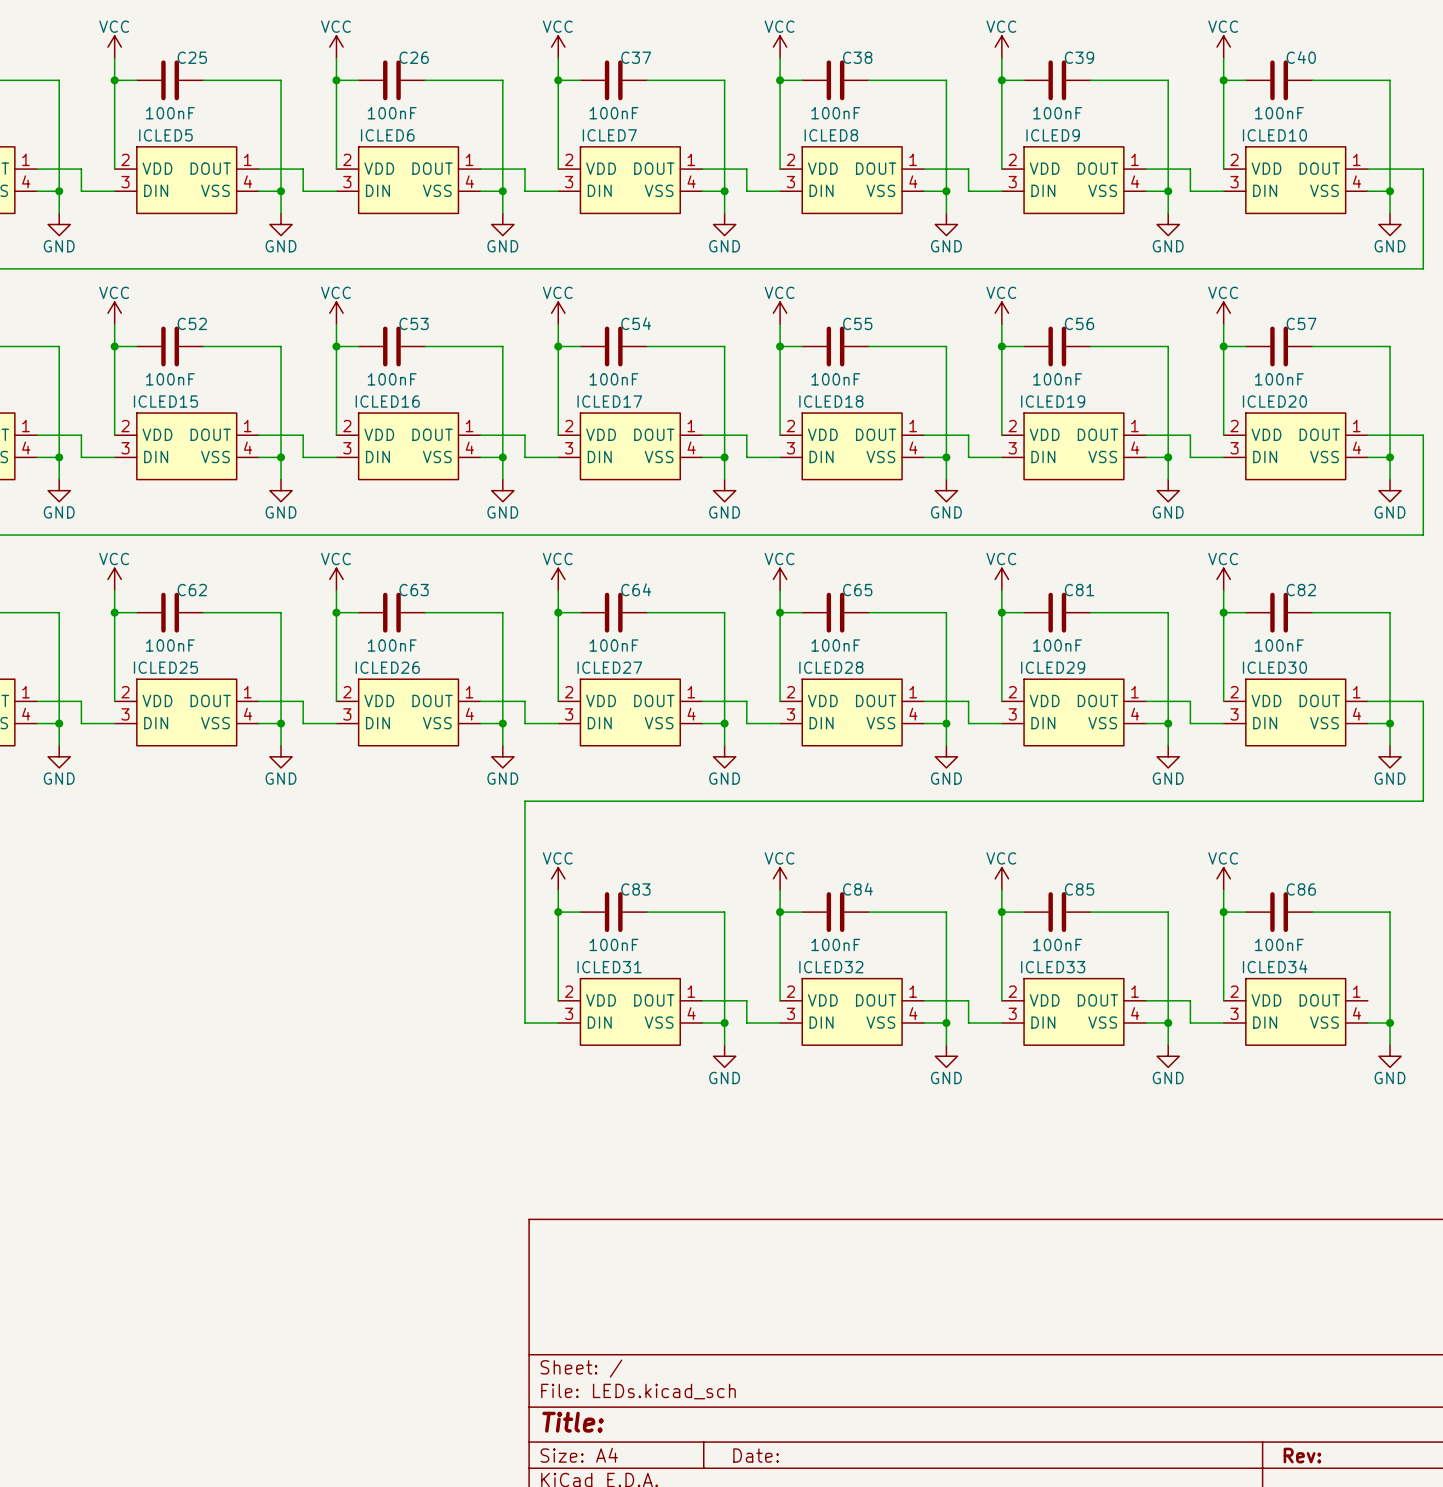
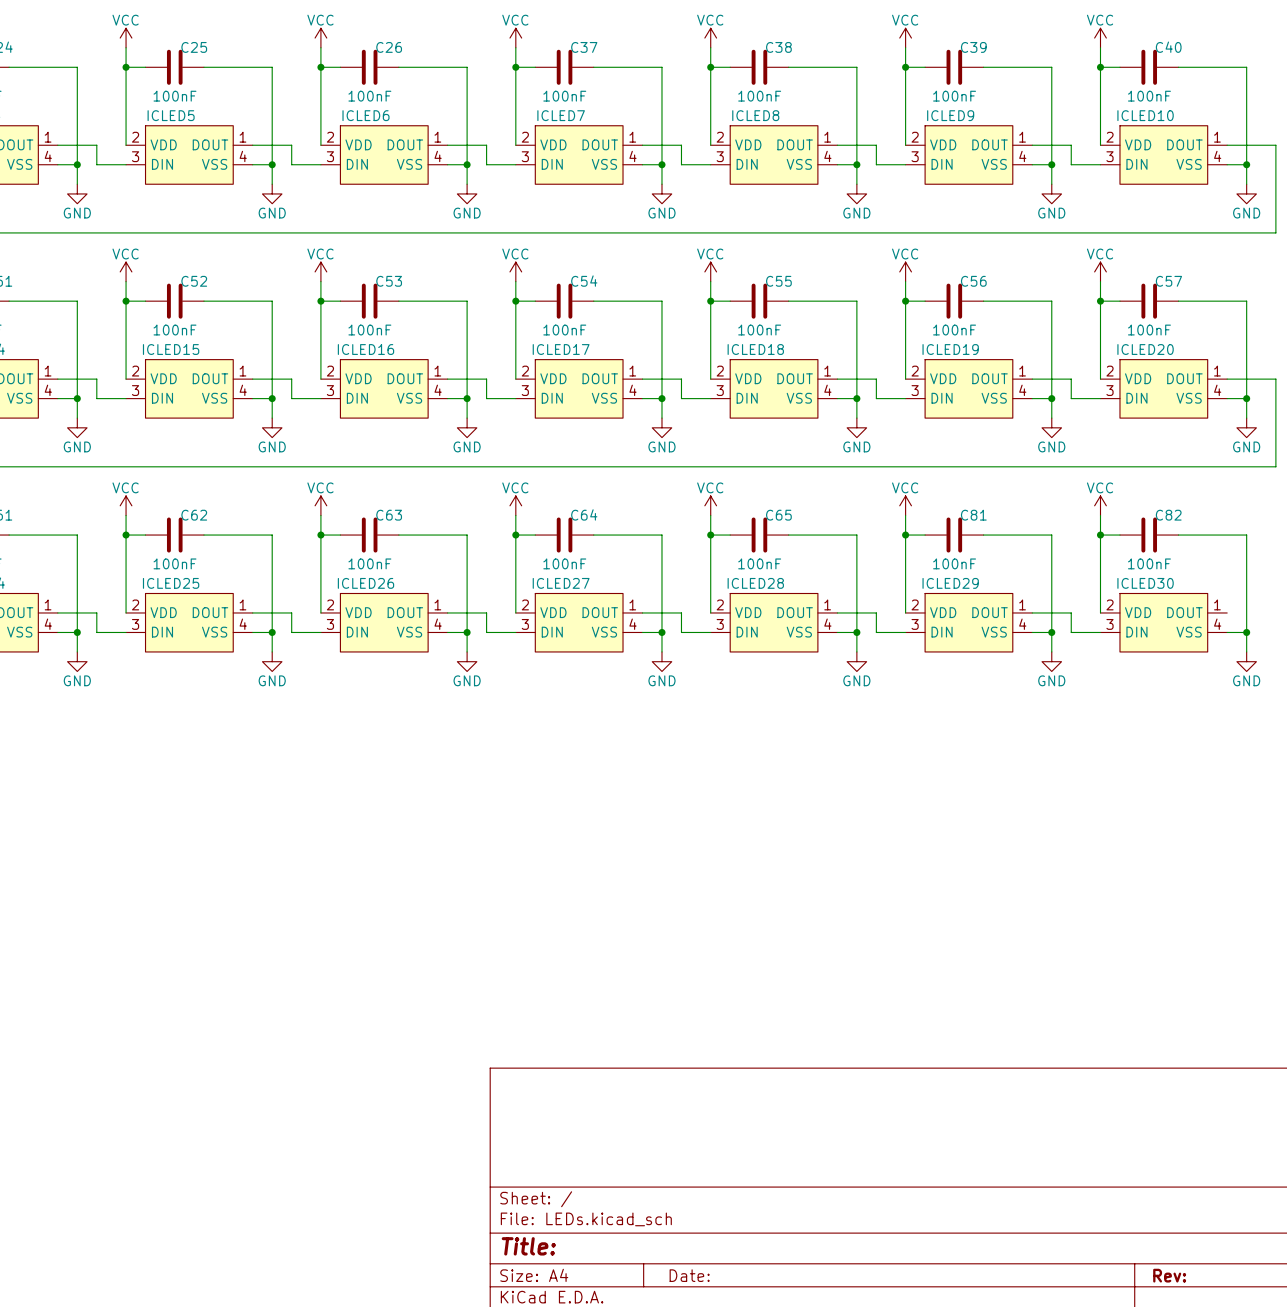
wire: (1367, 701) (1423, 701) (1423, 801) (524, 801) (524, 1022) (558, 1022) -> none
power symbol: VCC (558, 878) -> none
power symbol: VCC (780, 878) -> none
power symbol: VCC (1001, 878) -> none
power symbol: VCC (1223, 878) -> none
wire: (558, 889) (558, 1000) -> none
wire: (780, 889) (780, 1000) -> none
wire: (1001, 889) (1001, 1000) -> none
wire: (1223, 889) (1223, 1000) -> none
wire: (558, 912) (580, 912) -> none
junction: (558, 912) -> none
C83: 100nF (613, 912) -> none
wire: (646, 912) (724, 912) (724, 1045) -> none
wire: (780, 912) (802, 912) -> none
junction: (780, 912) -> none
C84: 100nF (835, 912) -> none
wire: (868, 912) (946, 912) (946, 1045) -> none
wire: (1001, 912) (1024, 912) -> none
junction: (1001, 912) -> none
C85: 100nF (1057, 912) -> none
wire: (1090, 912) (1168, 912) (1168, 1045) -> none
wire: (1223, 912) (1245, 912) -> none
junction: (1223, 912) -> none
C86: 100nF (1279, 912) -> none
wire: (1312, 912) (1390, 912) (1390, 1045) -> none
wire: (702, 1000) (746, 1000) (746, 1022) (780, 1022) -> none
wire: (924, 1000) (968, 1000) (968, 1022) (1001, 1022) -> none
wire: (1146, 1000) (1190, 1000) (1190, 1022) (1223, 1022) -> none
ICLED31: (630, 1011) -> none
ICLED32: (852, 1011) -> none
ICLED33: (1073, 1011) -> none
ICLED34: (1295, 1011) -> none
wire: (702, 1022) (724, 1022) -> none
junction: (724, 1022) -> none
wire: (924, 1022) (946, 1022) -> none
junction: (946, 1022) -> none
wire: (1146, 1022) (1168, 1022) -> none
junction: (1168, 1022) -> none
wire: (1367, 1022) (1390, 1022) -> none
junction: (1390, 1022) -> none
power symbol: GND (724, 1056) -> none
power symbol: GND (946, 1056) -> none
power symbol: GND (1168, 1056) -> none
power symbol: GND (1390, 1056) -> none

